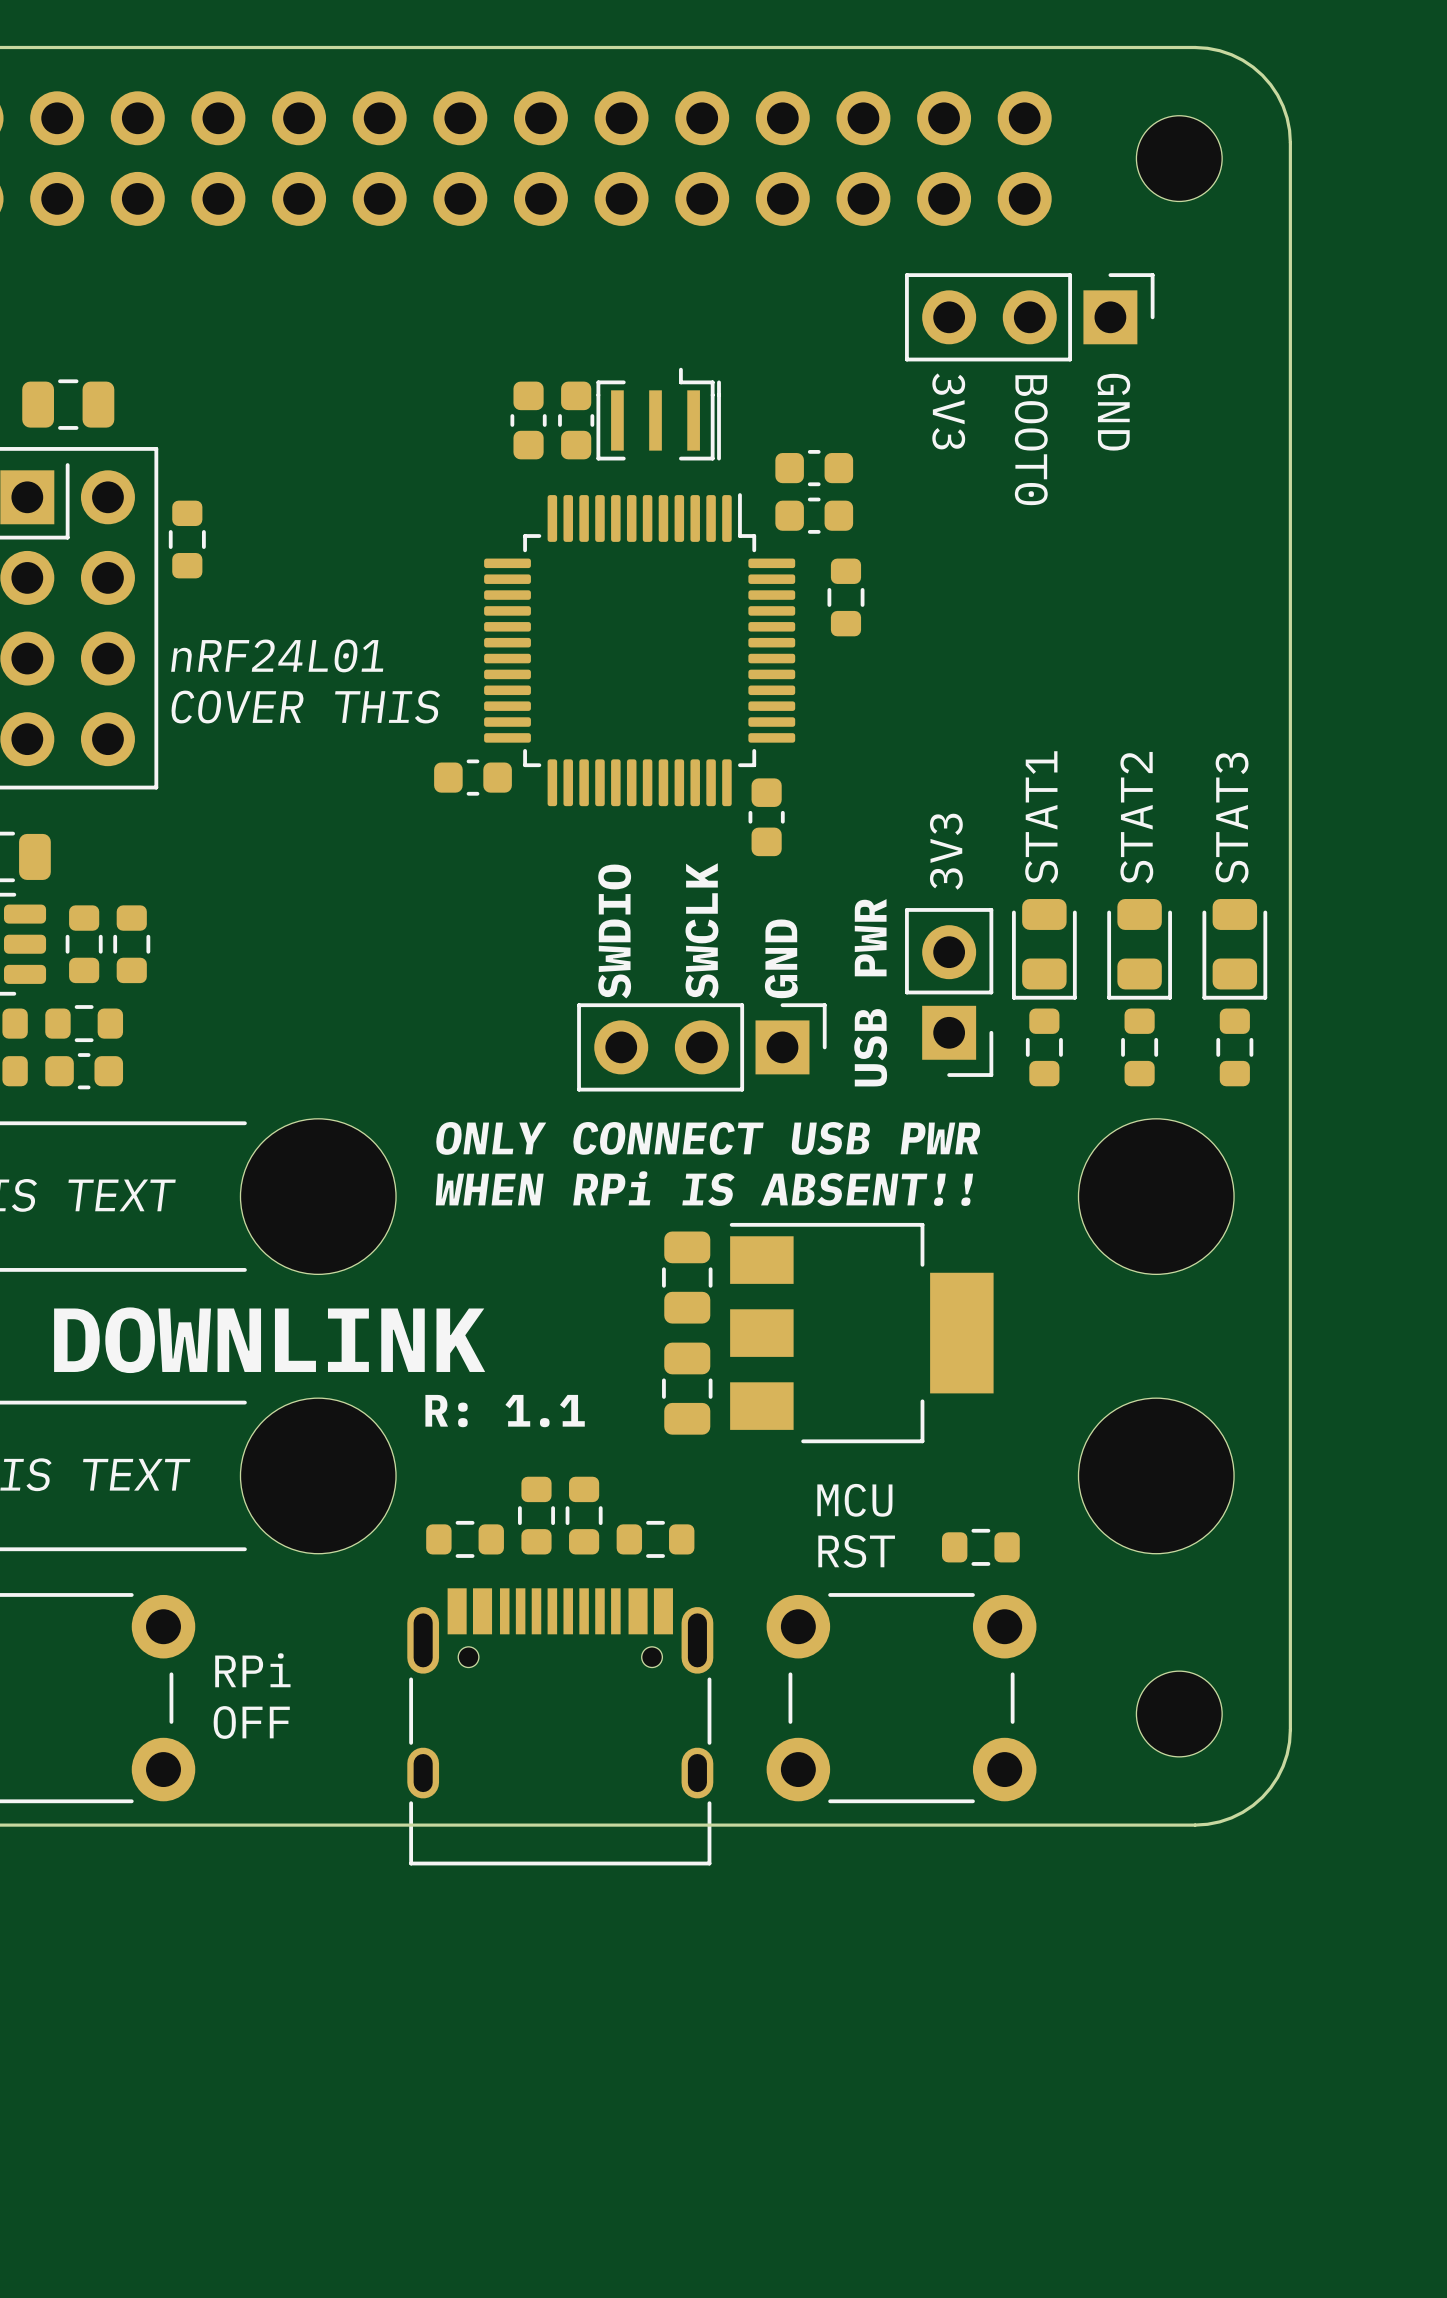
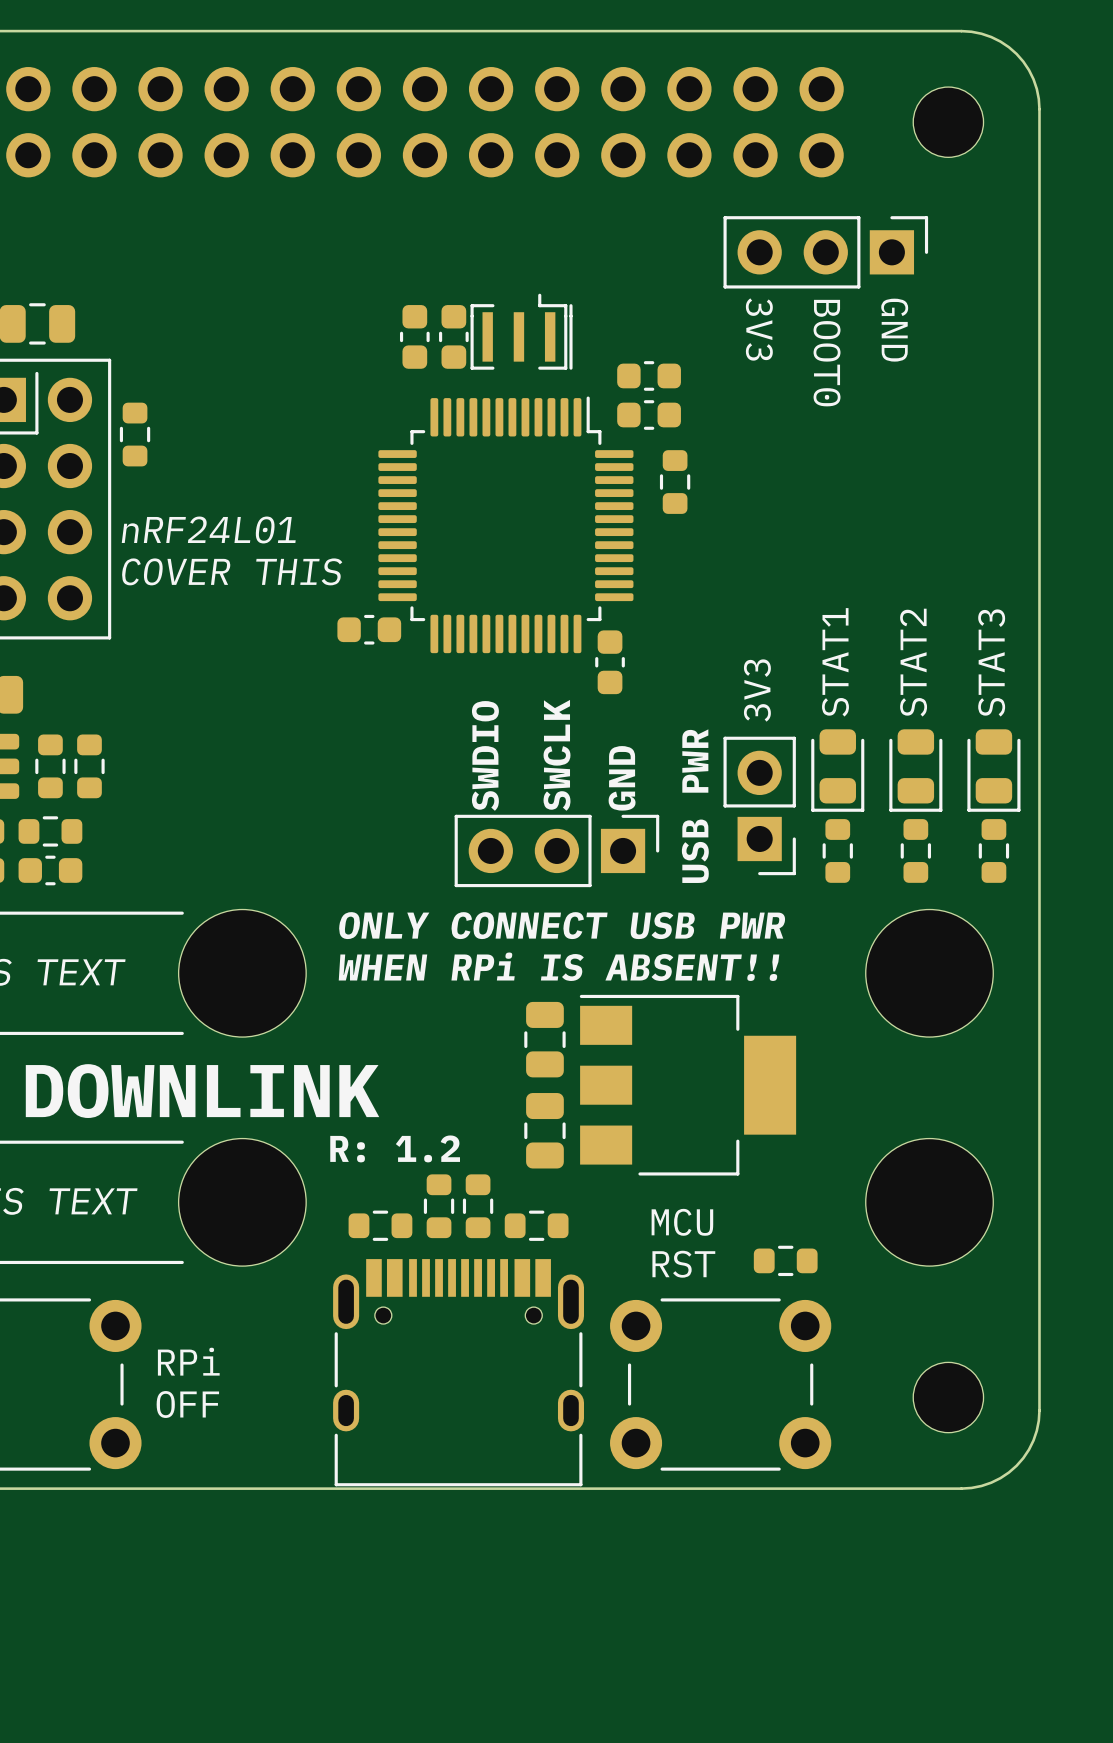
text: R: 1.1 (505, 1411) -> R: 1.2 (395, 1148)
part: none -> (439, 1206)
part: none -> (478, 1206)
part: none -> (380, 1225)
part: none -> (536, 1225)
part: (536, 1515) -> none
part: (584, 1515) -> none
part: (465, 1539) -> none
part: (655, 1539) -> none
part position: (560, 1726) -> (458, 1372)

